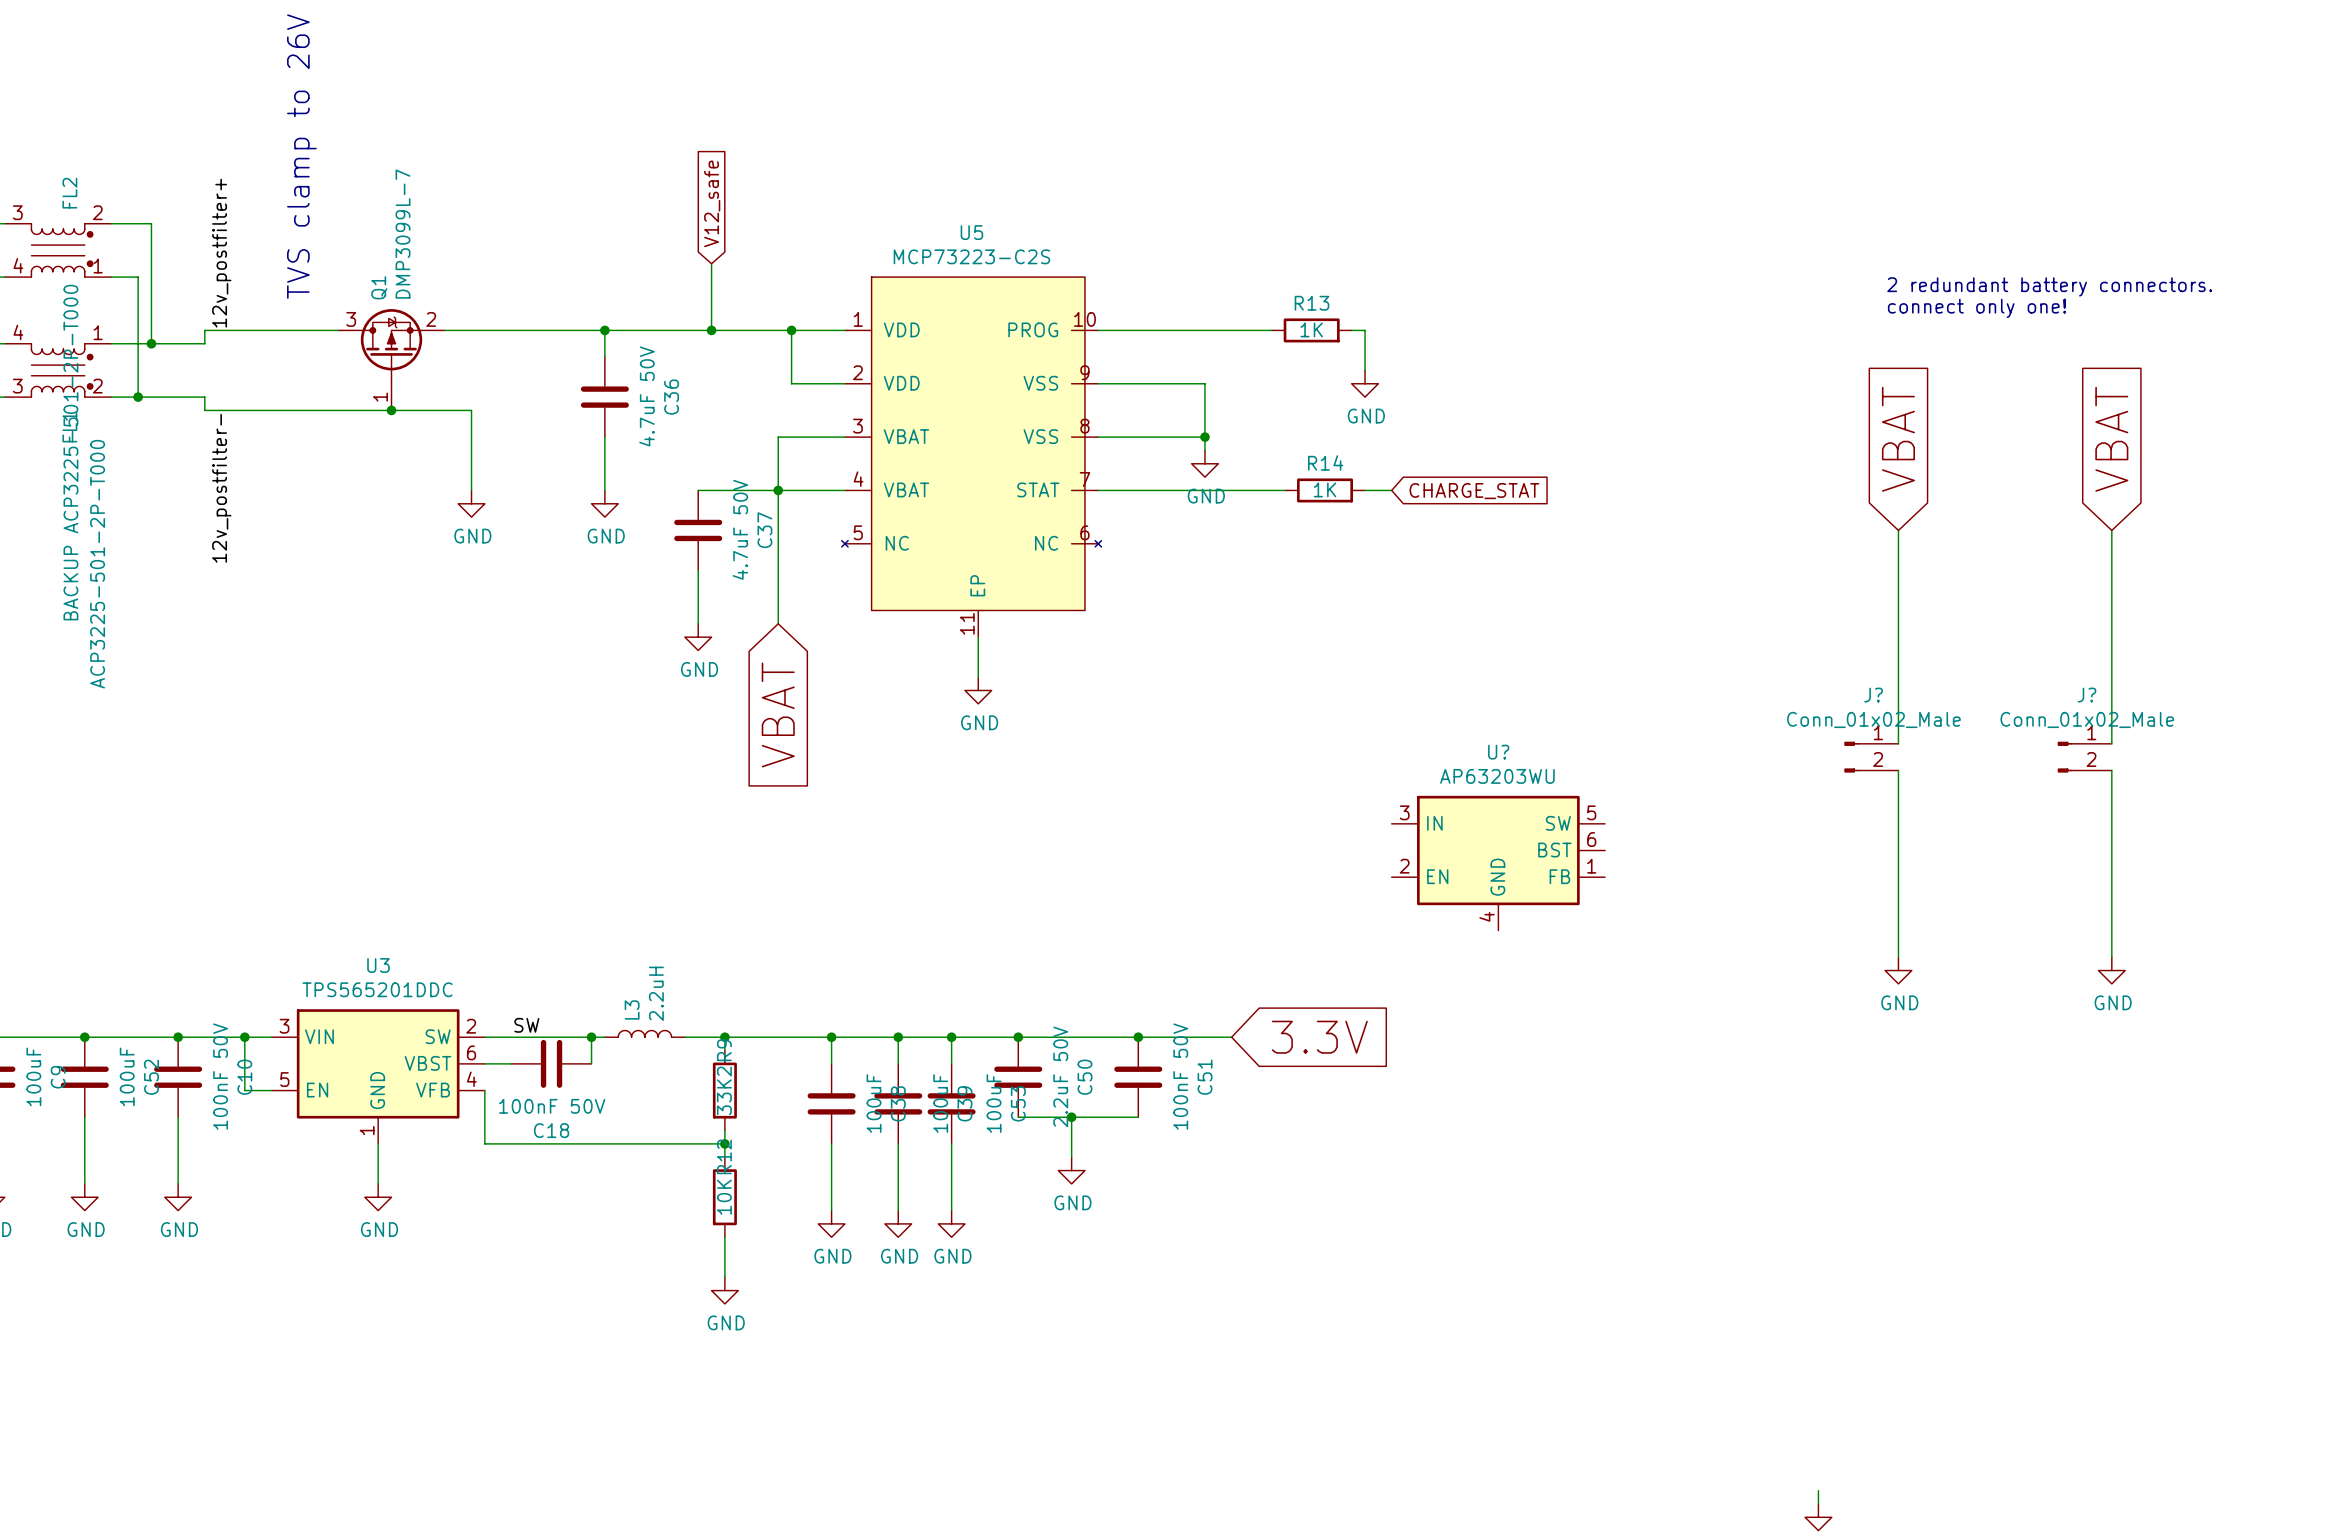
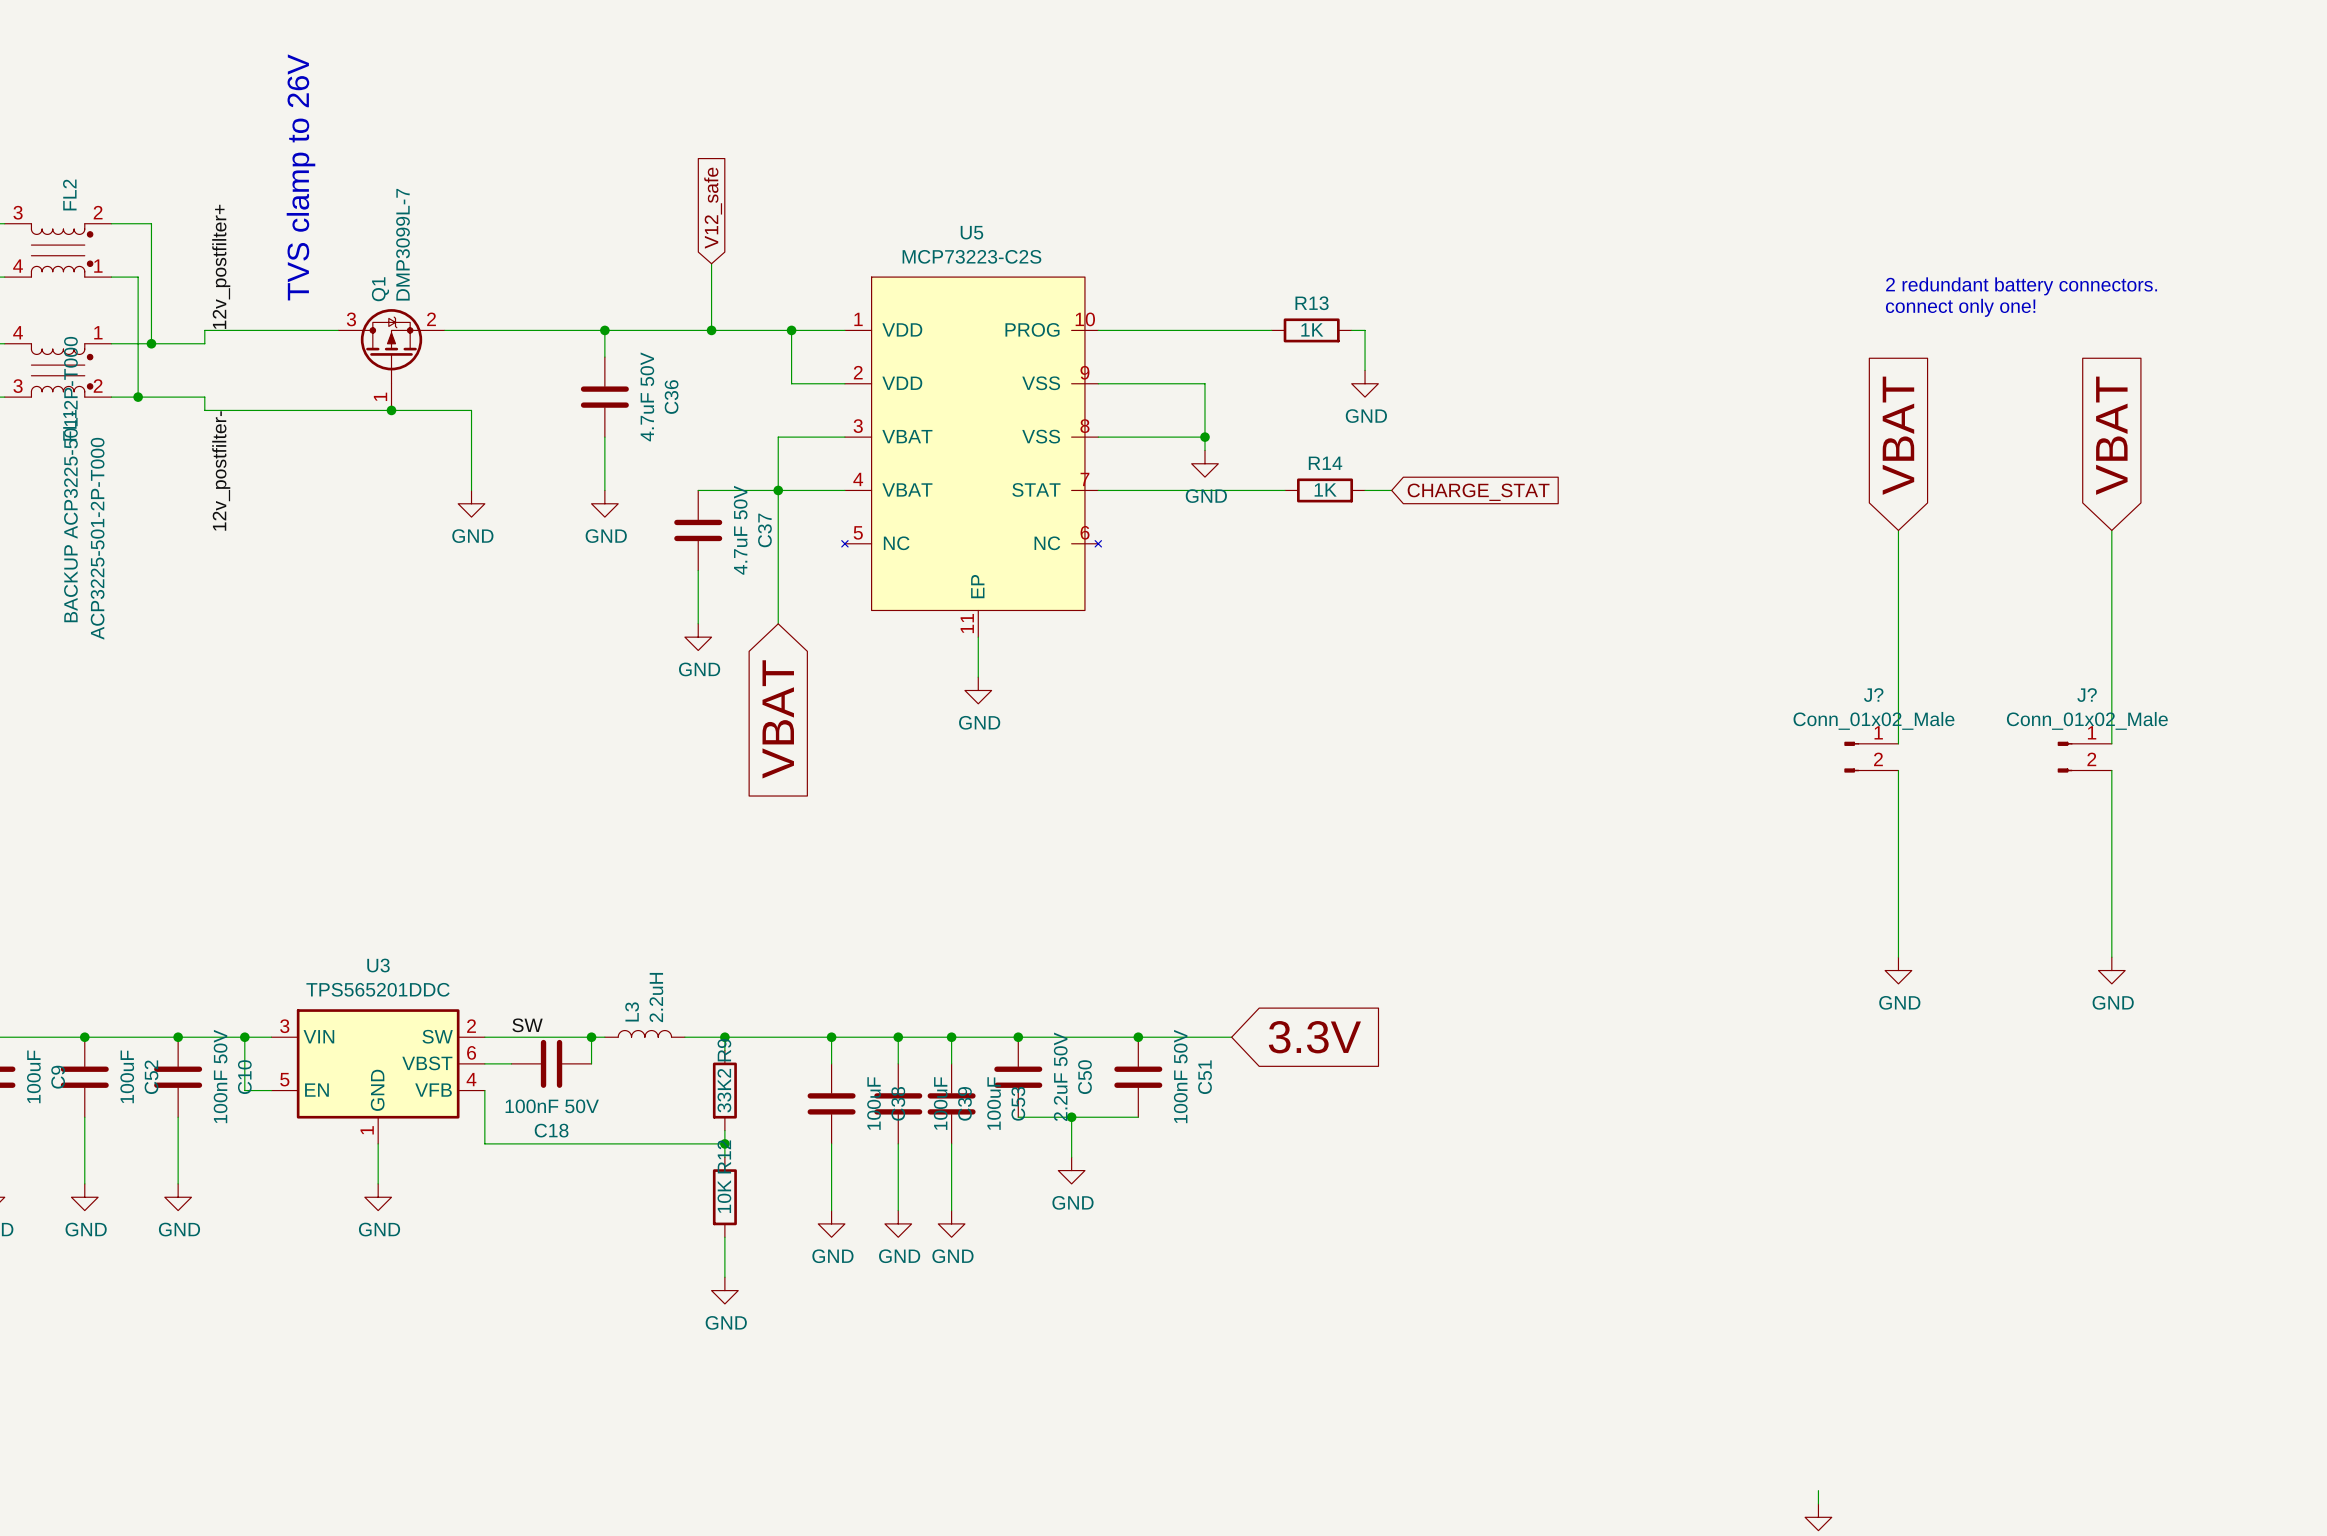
U?: AP63203WU (1498, 863) -> none

